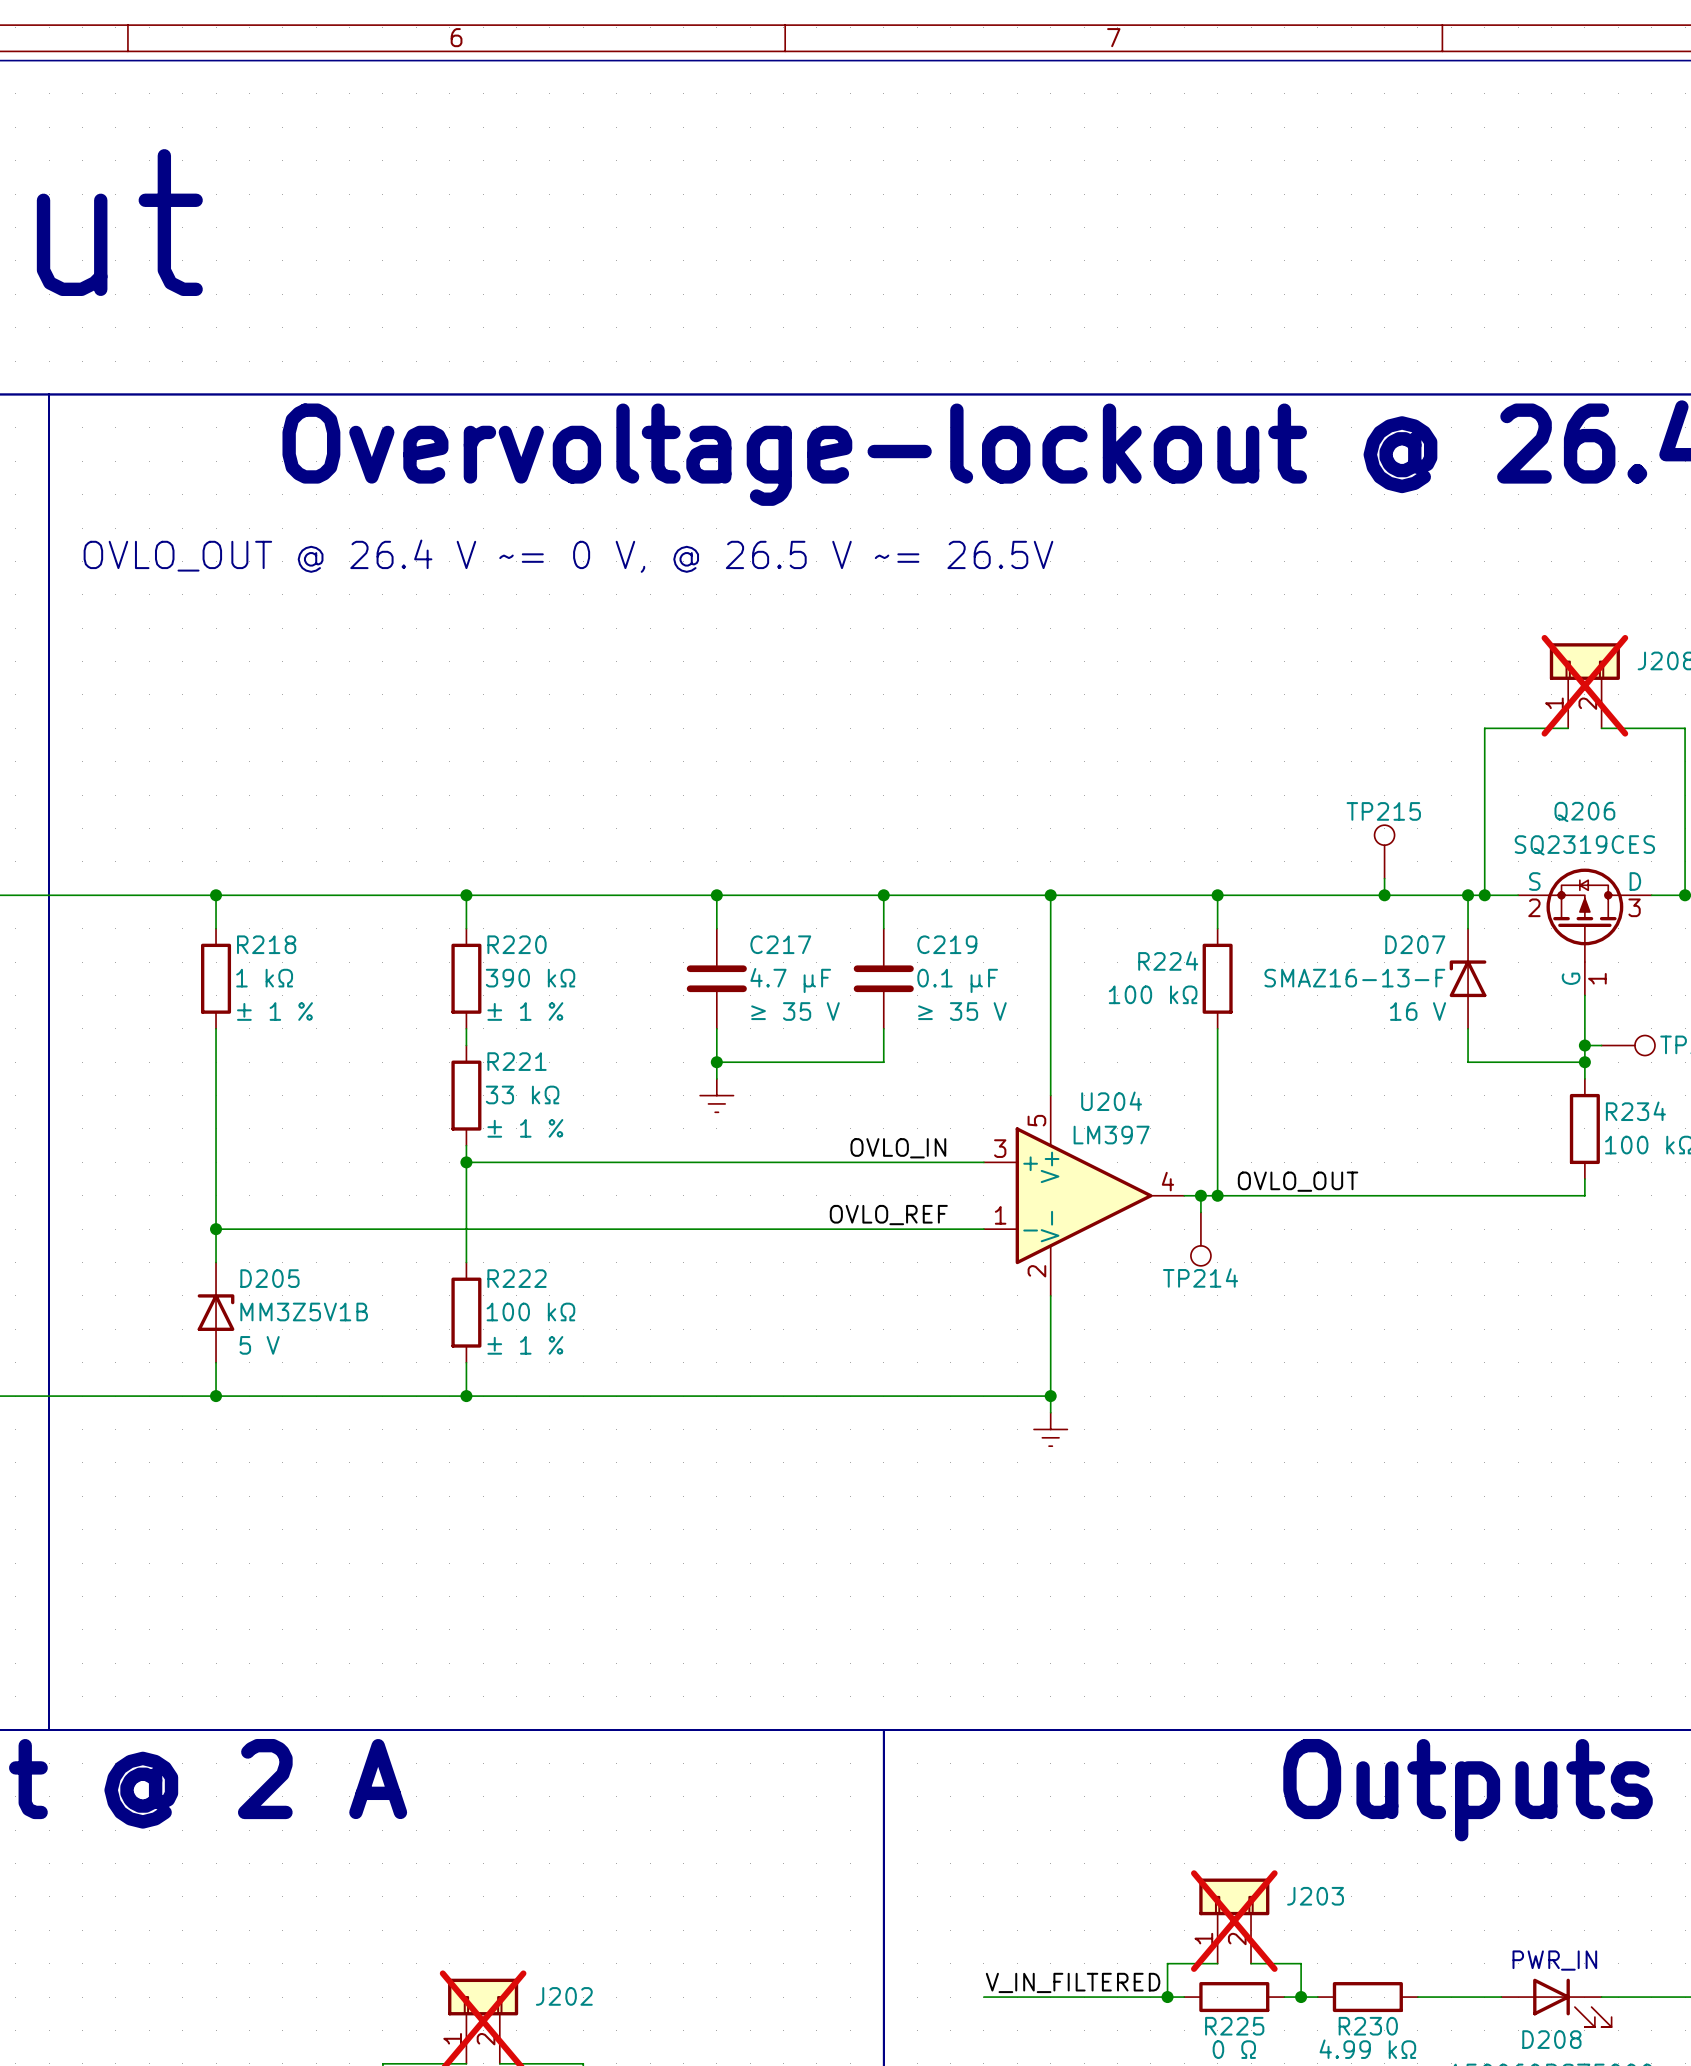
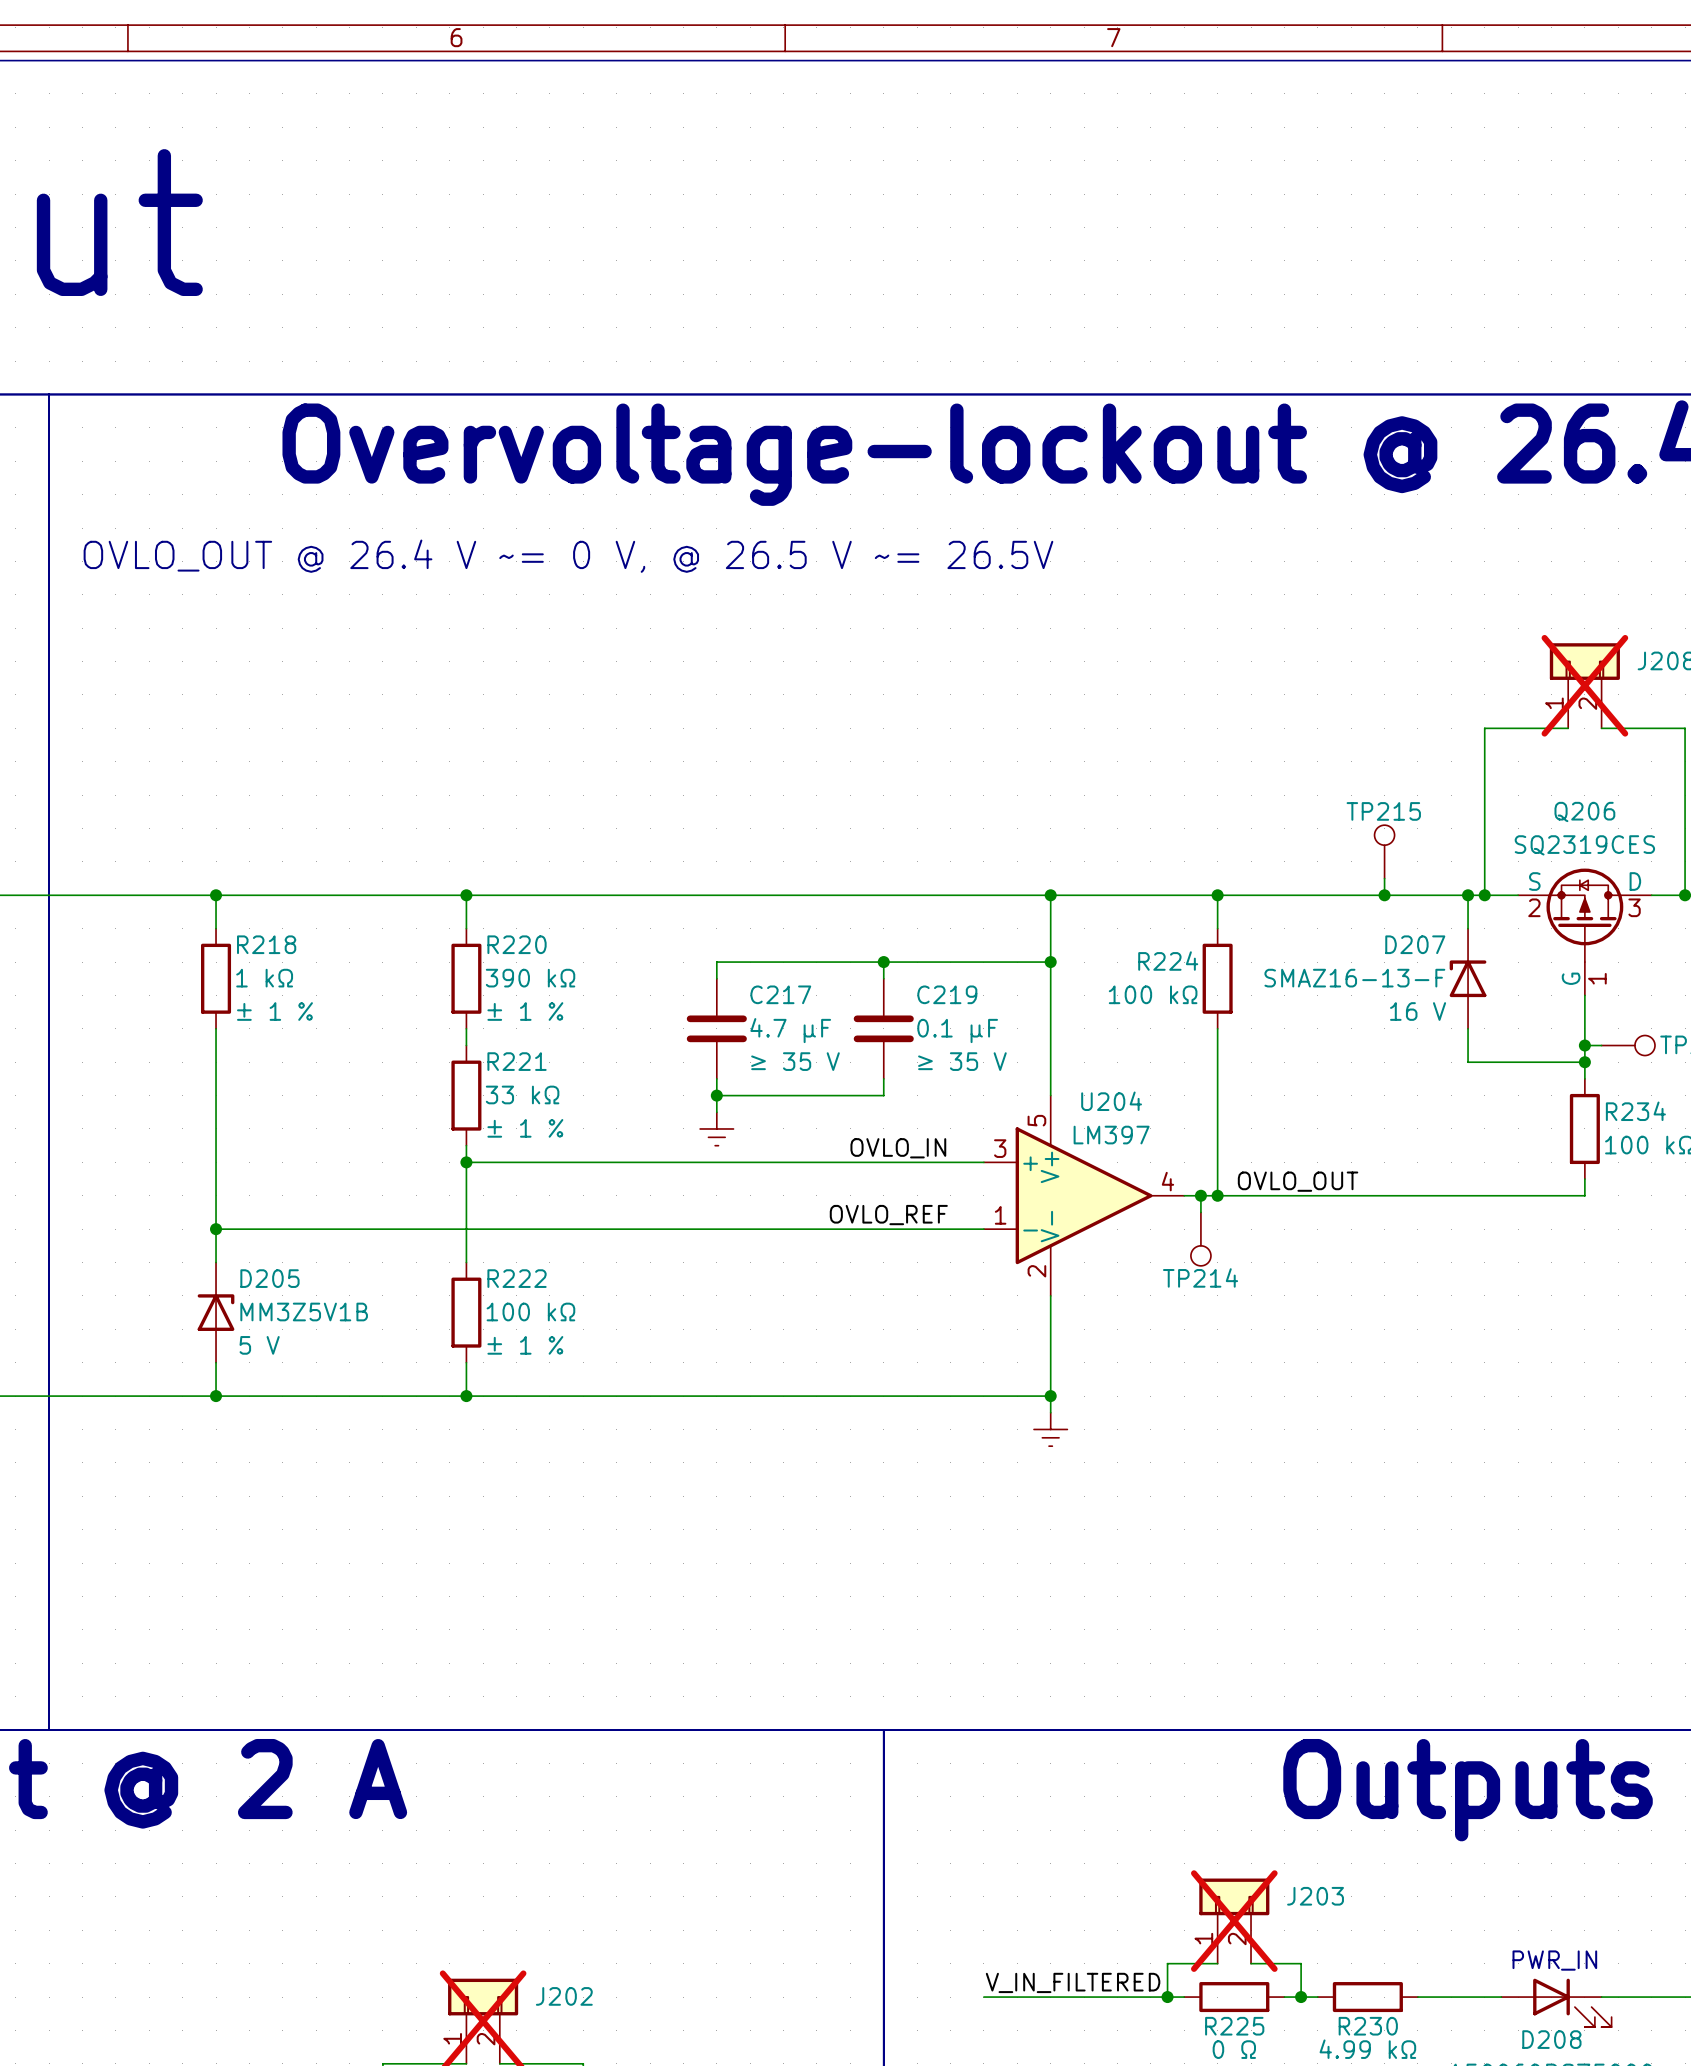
wire: (716, 895) (716, 928) -> none
junction: (716, 895) -> none
wire: (883, 895) (883, 928) -> none
junction position: (883, 895) -> (883, 962)
wire: none -> (1050, 962) (716, 962) (716, 978)
junction: none -> (1050, 962)
C217 position: (716, 978) -> (716, 1028)
C219 position: (883, 978) -> (883, 1028)
wire: (883, 1028) (883, 1062) (716, 1062) -> none
junction position: (716, 1062) -> (716, 1095)
wire: none -> (883, 1078) (883, 1095) (716, 1095)
power symbol position: (716, 1095) -> (716, 1128)

